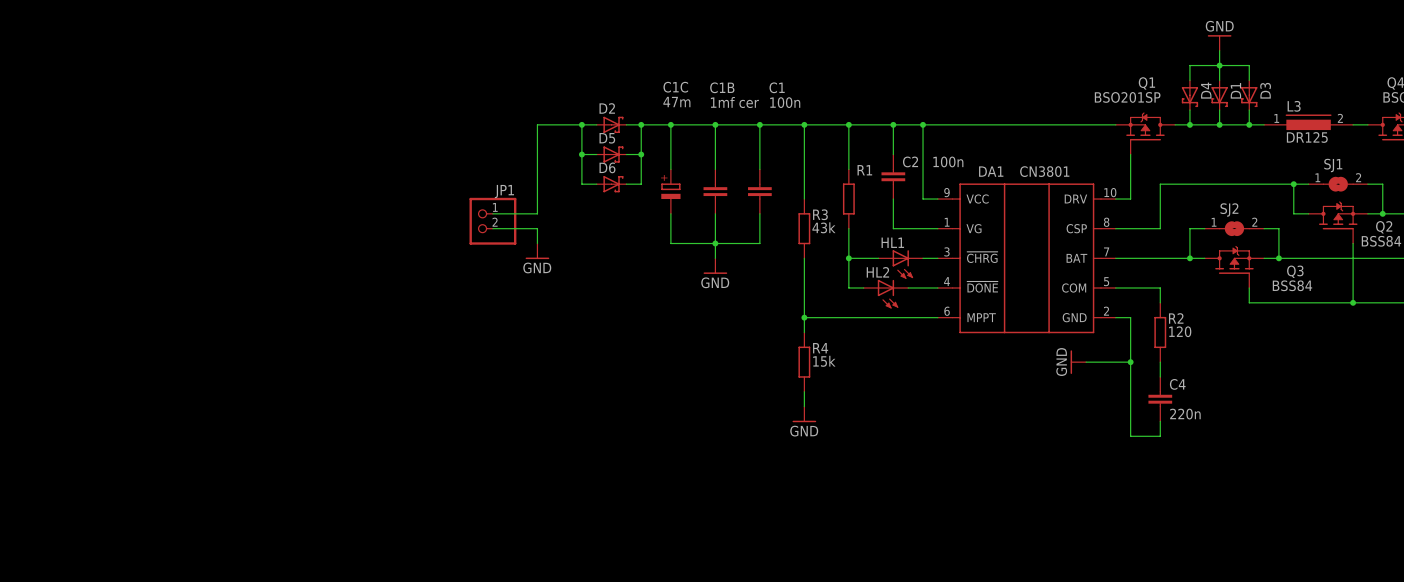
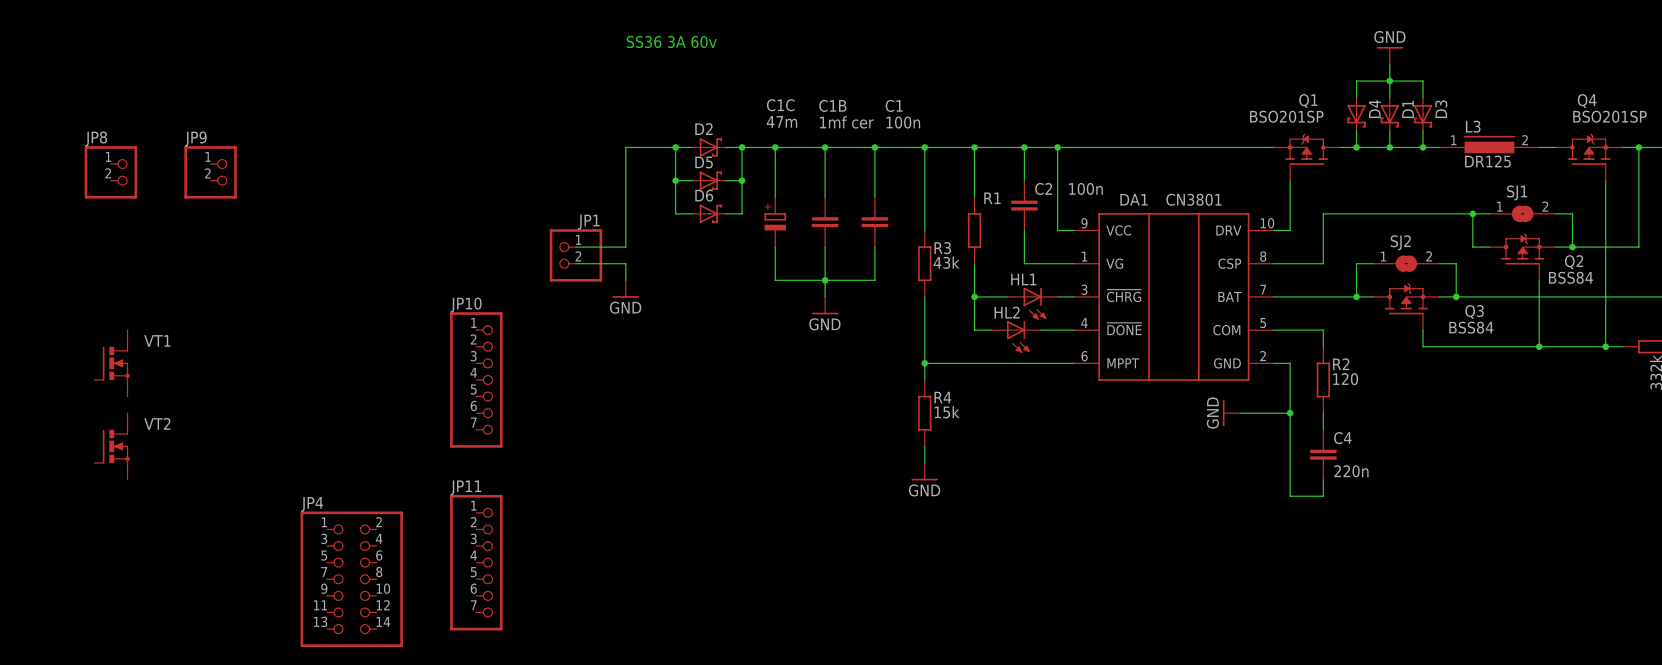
text: none -> SS36 3A 60v (671, 41)
JP8: none -> (110, 172)
JP9: none -> (210, 172)
VT1: none -> (111, 363)
JP10: none -> (476, 379)
VT2: none -> (111, 446)
JP11: none -> (476, 562)
JP4: none -> (351, 579)

